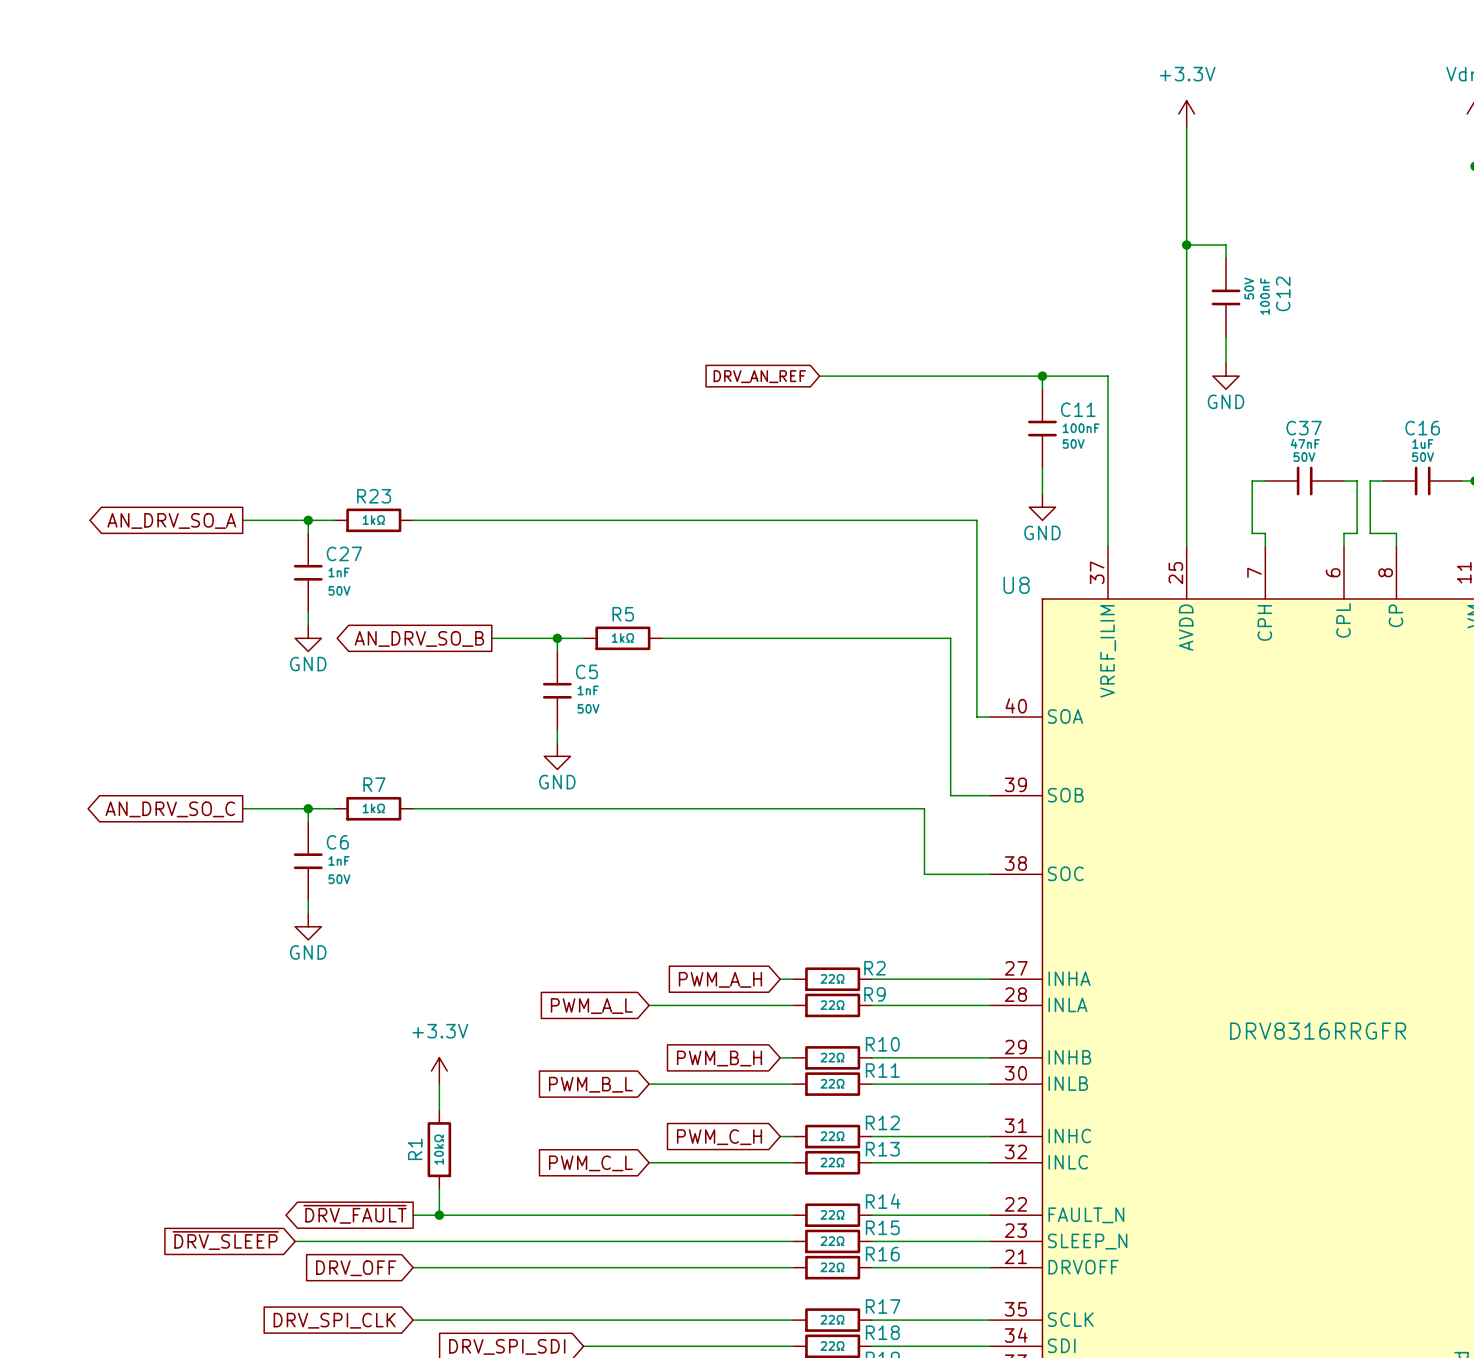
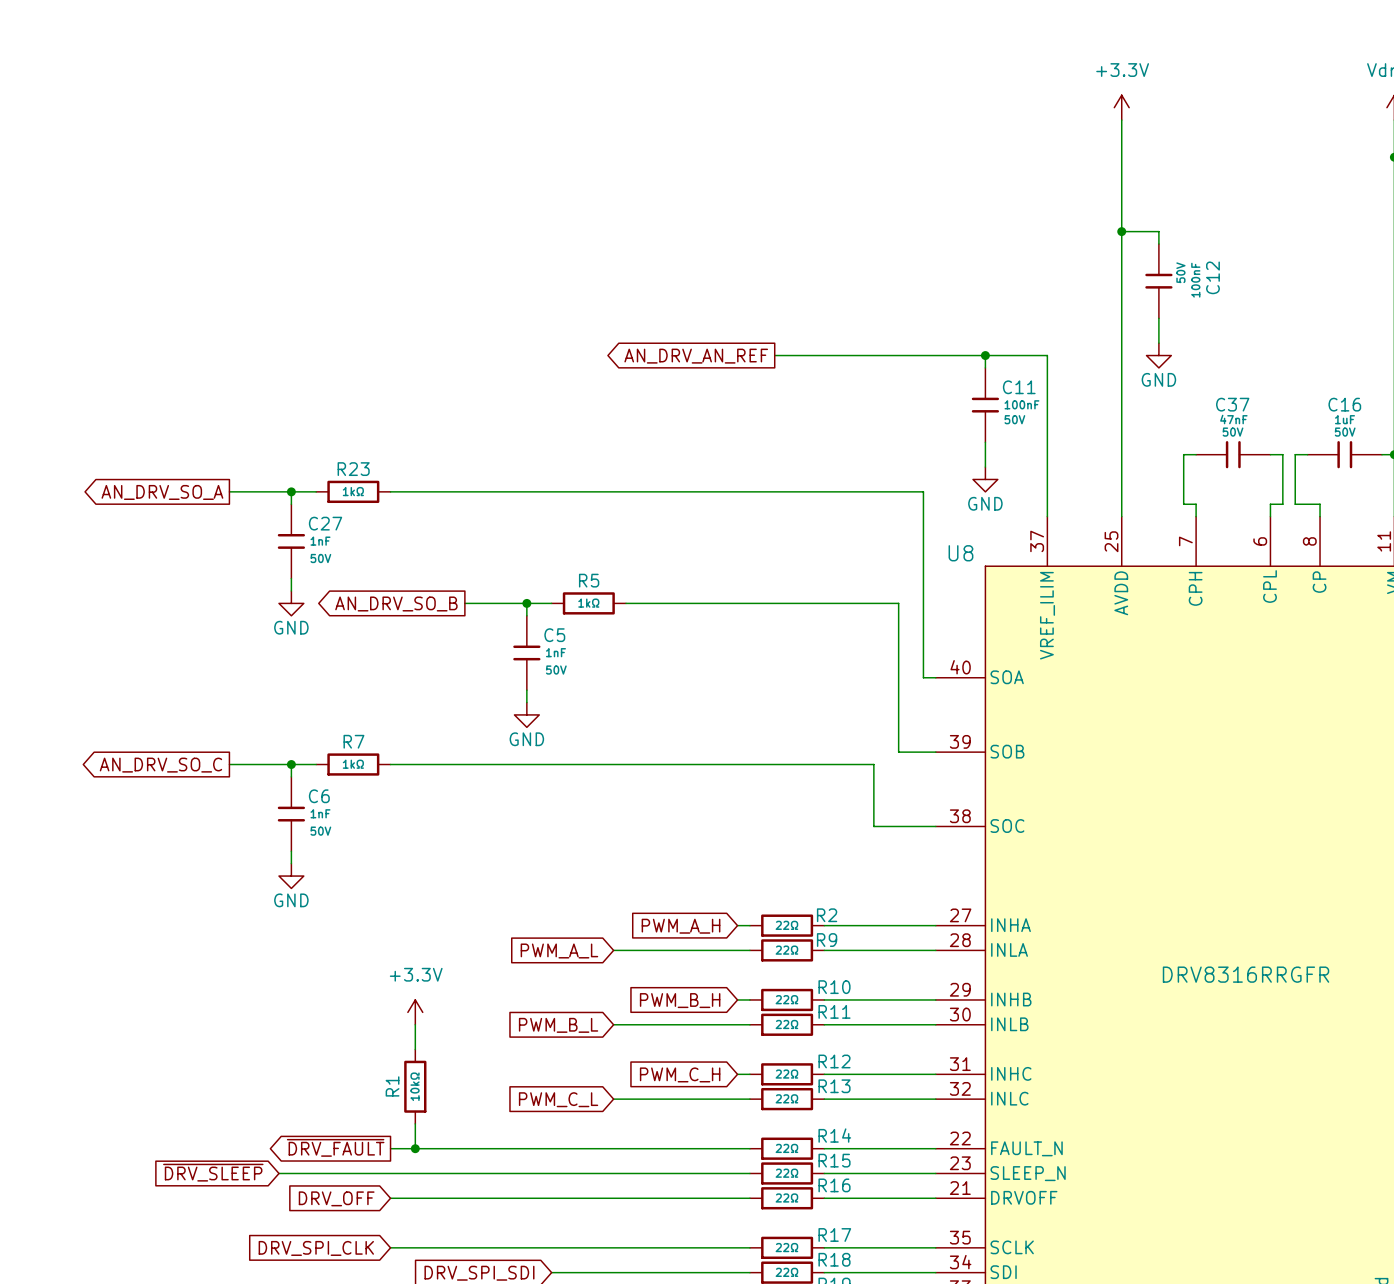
global label shape: input (759, 376) -> output (696, 356)
global label: DRV_AN_REF (759, 376) -> AN_DRV_AN_REF (696, 356)

